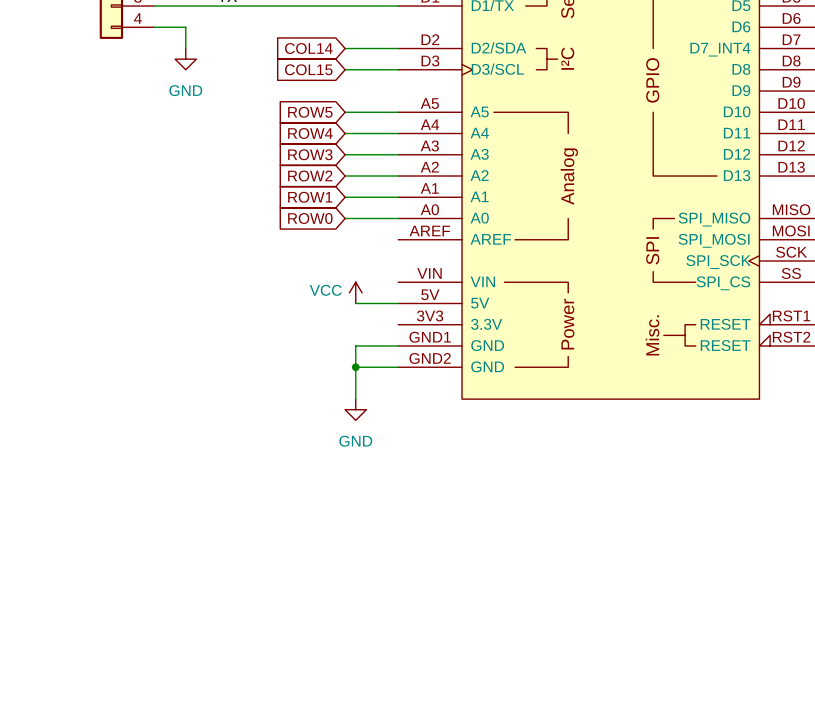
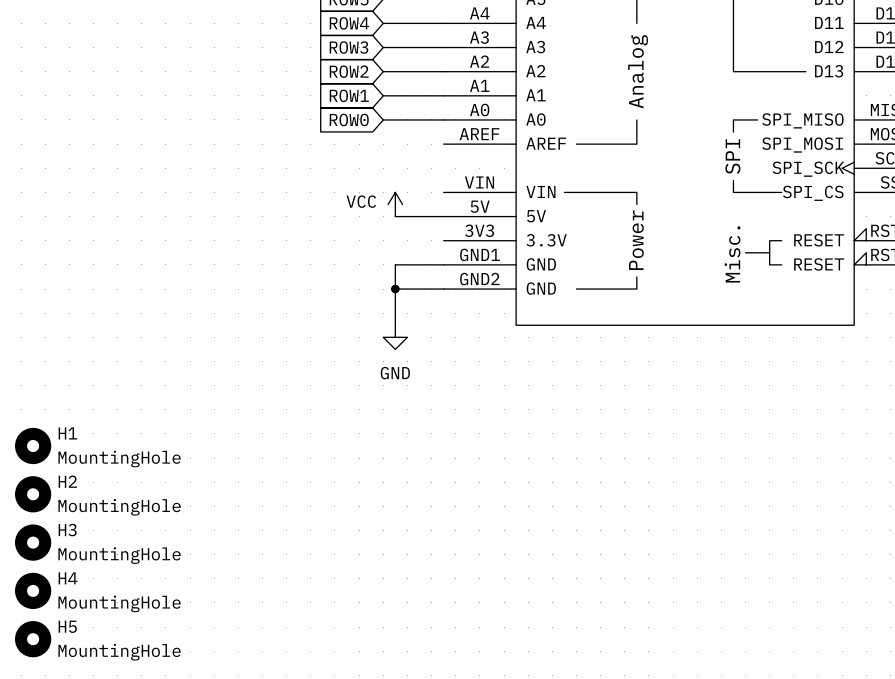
H1: none -> MountingHole (33, 446)
H2: none -> MountingHole (33, 494)
H3: none -> MountingHole (33, 542)
H4: none -> MountingHole (33, 590)
H5: none -> MountingHole (33, 639)

